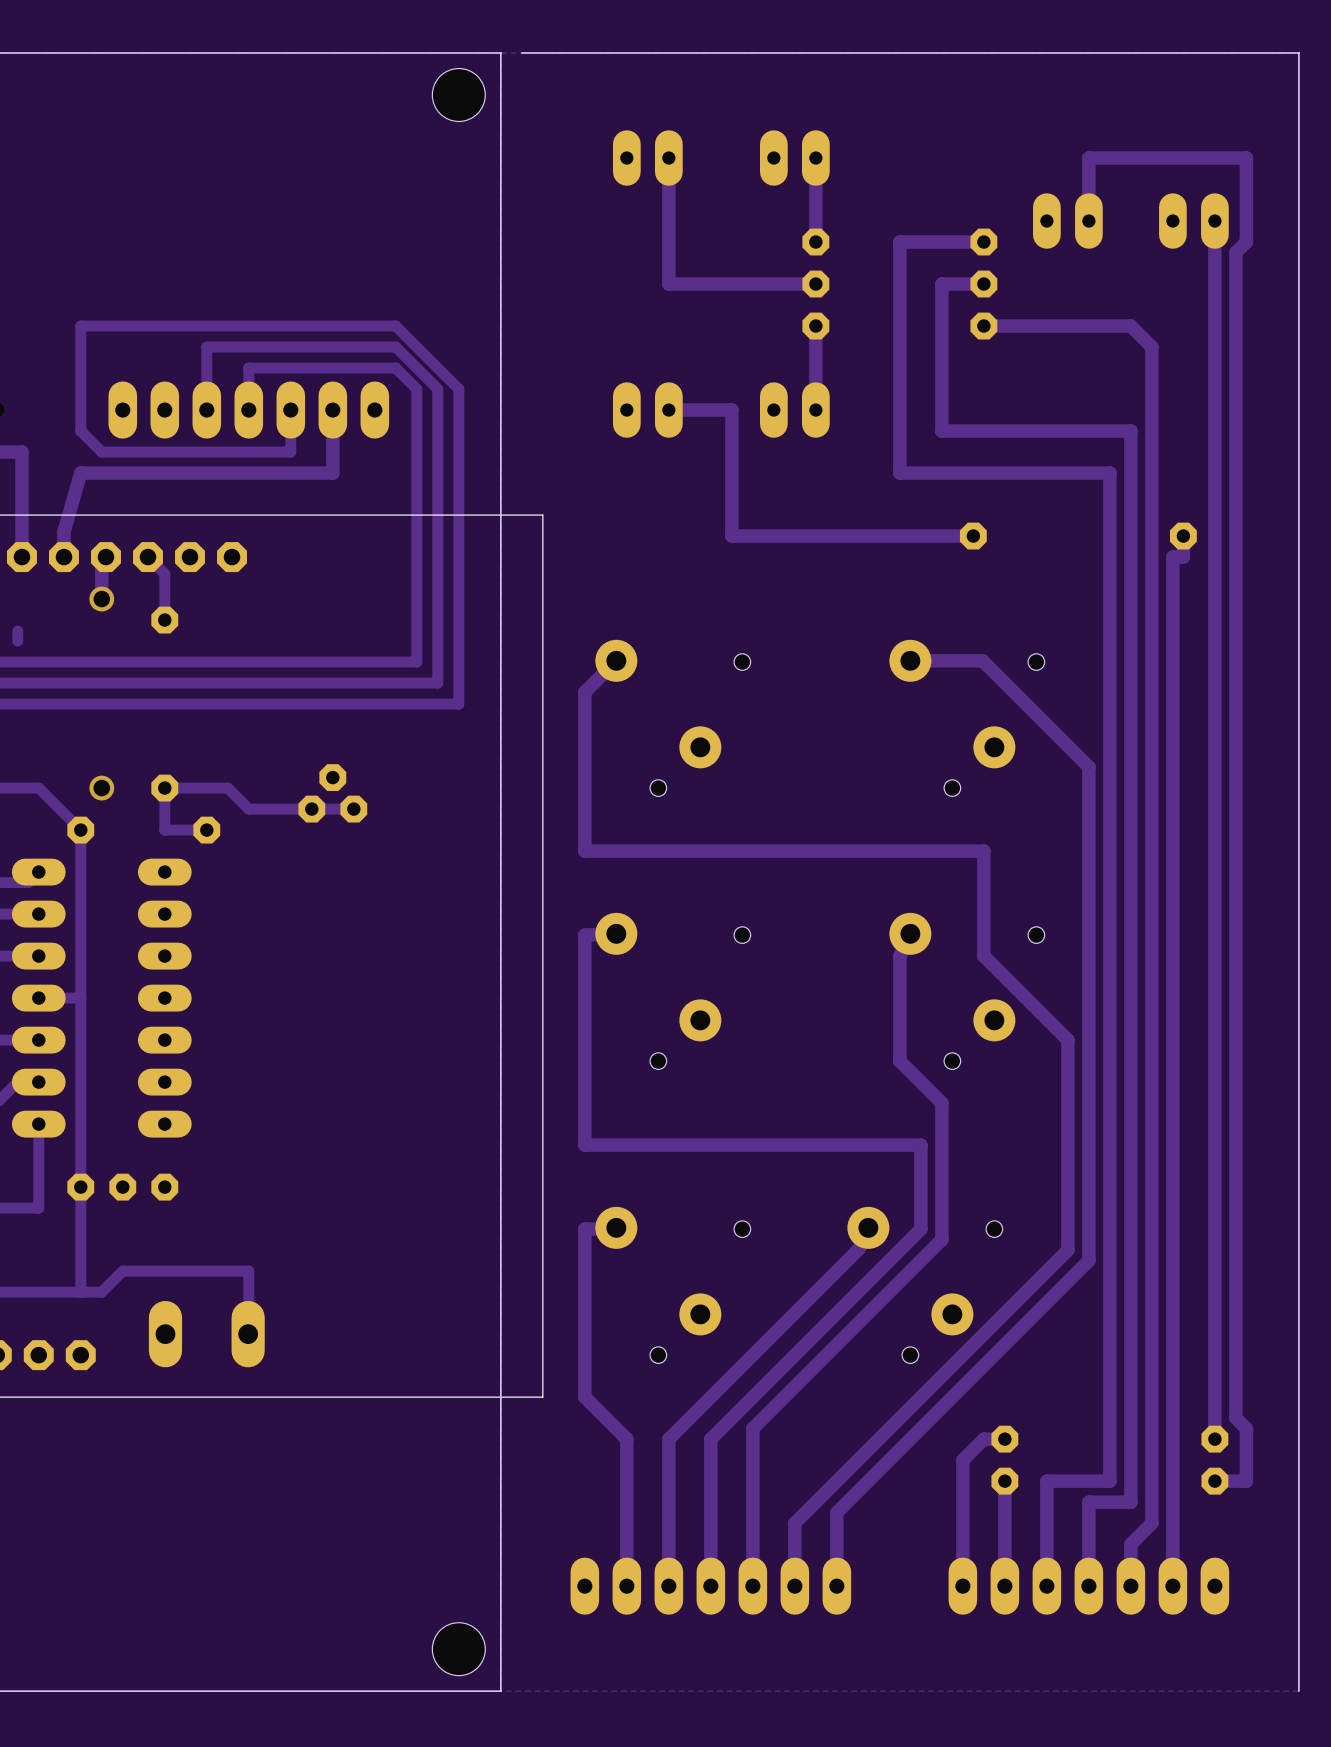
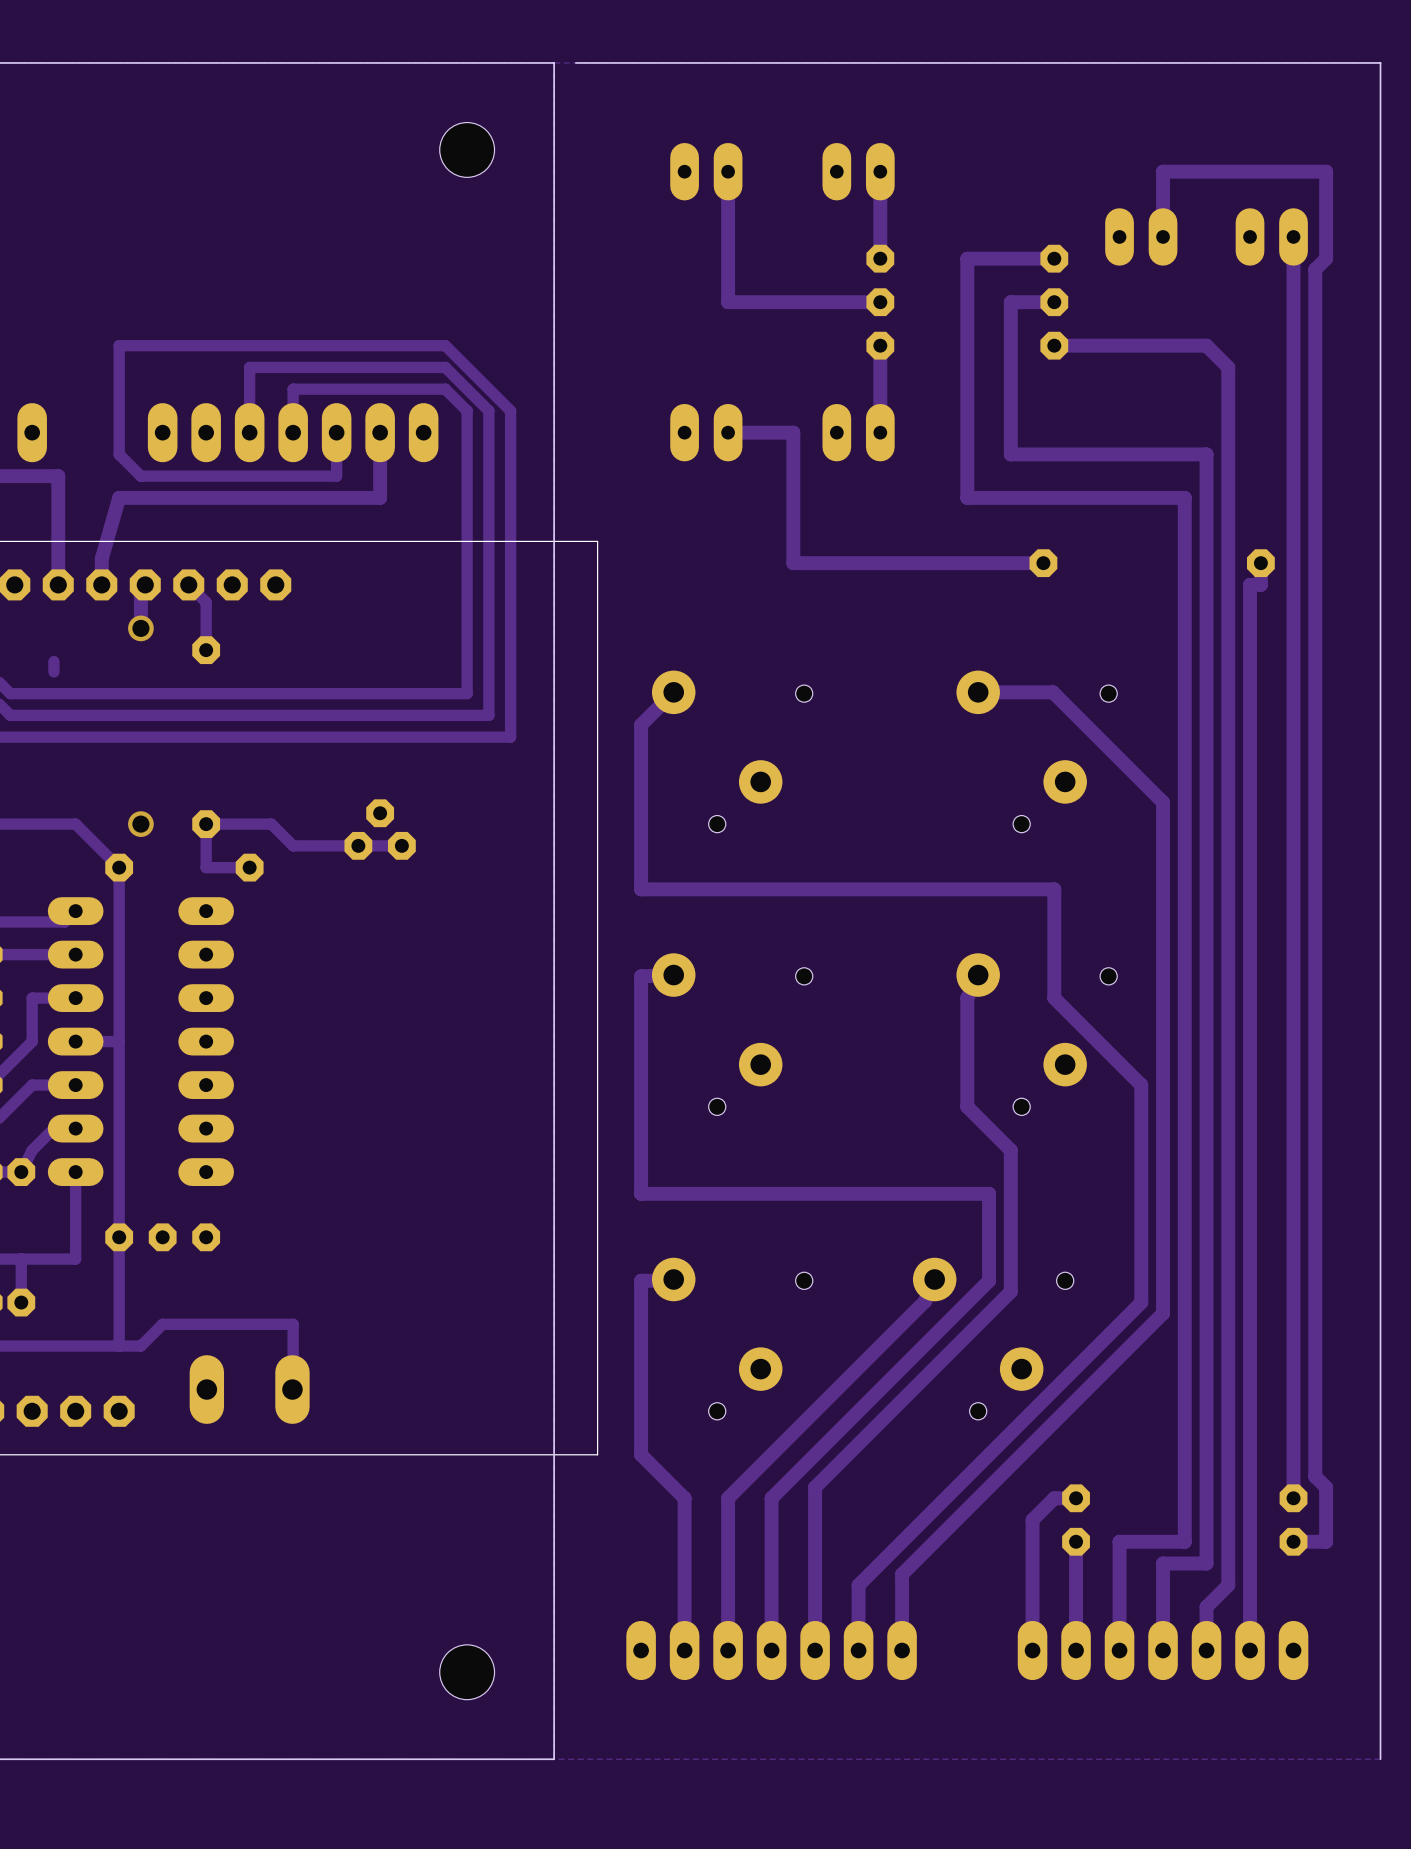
hole position: (458, 95) -> (467, 149)
hole position: (458, 1649) -> (467, 1672)

